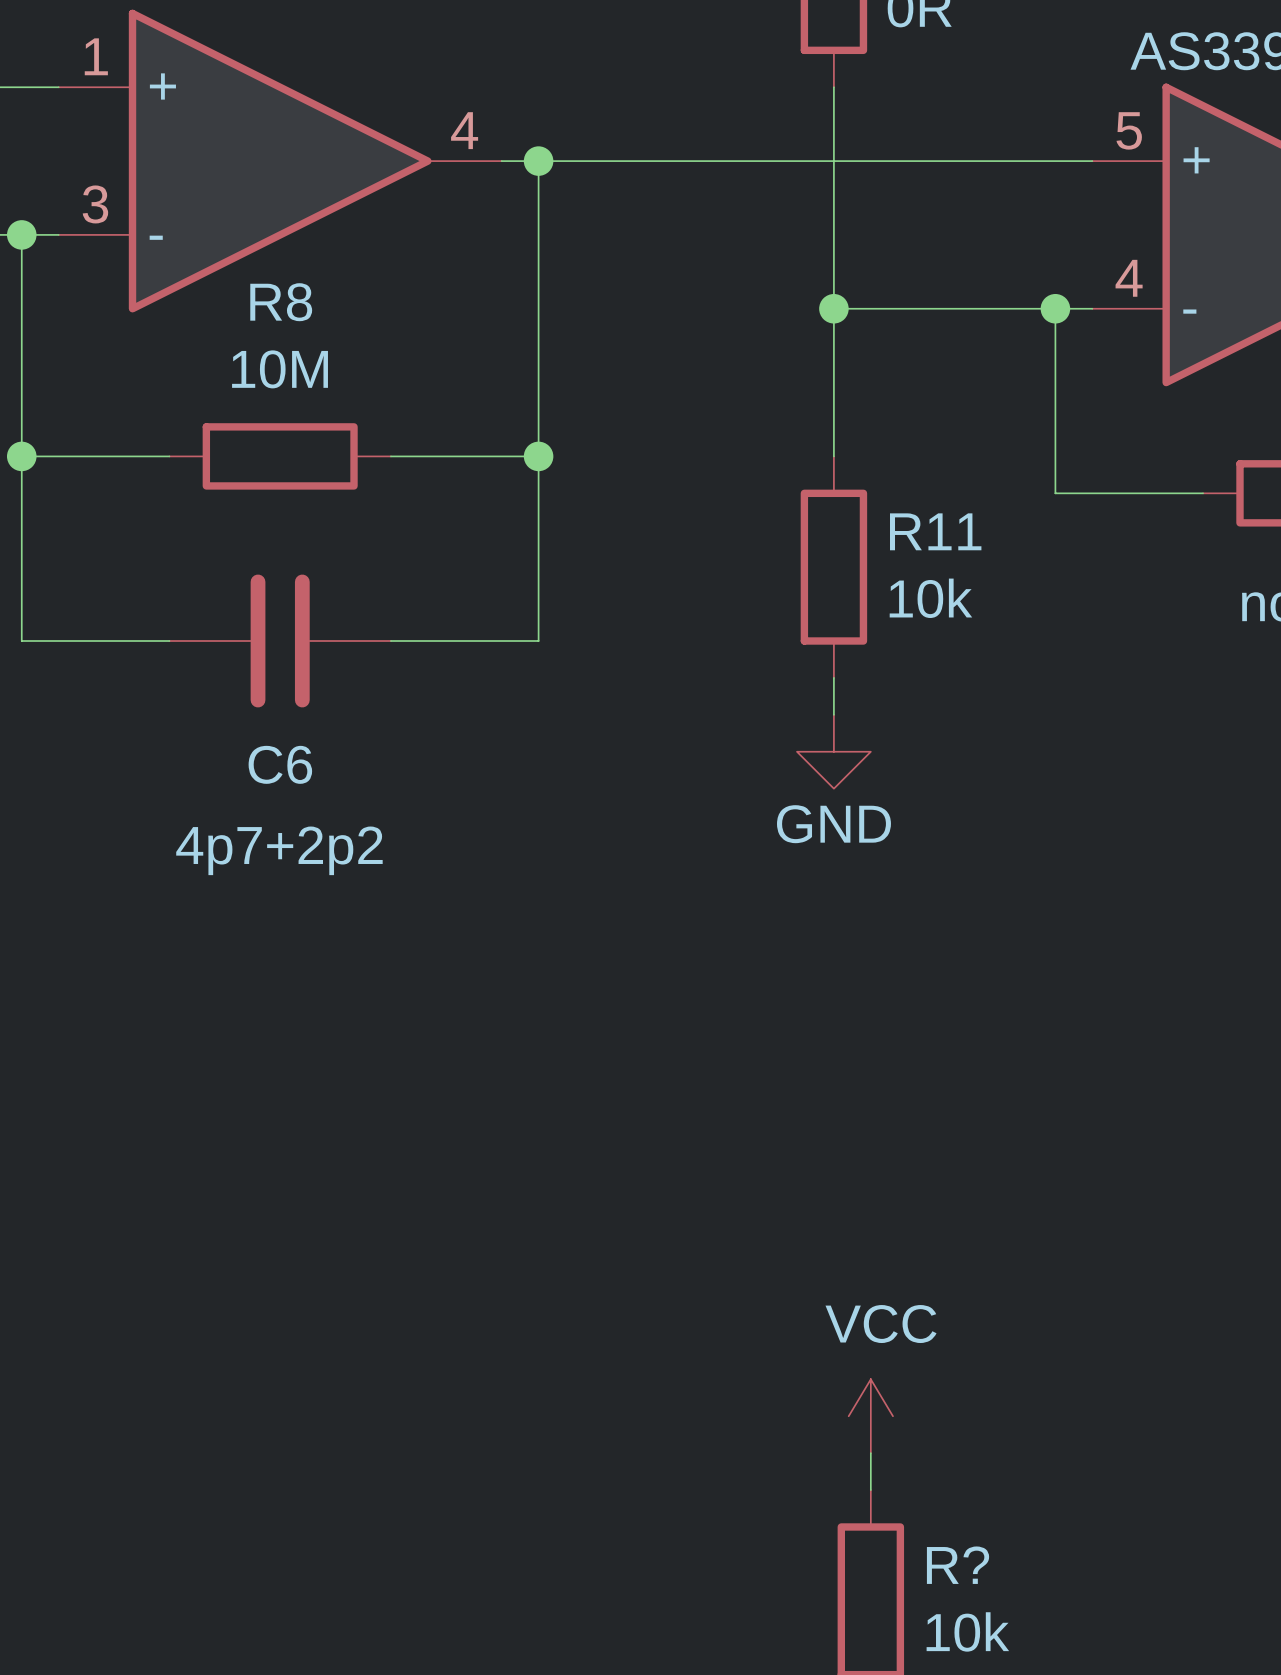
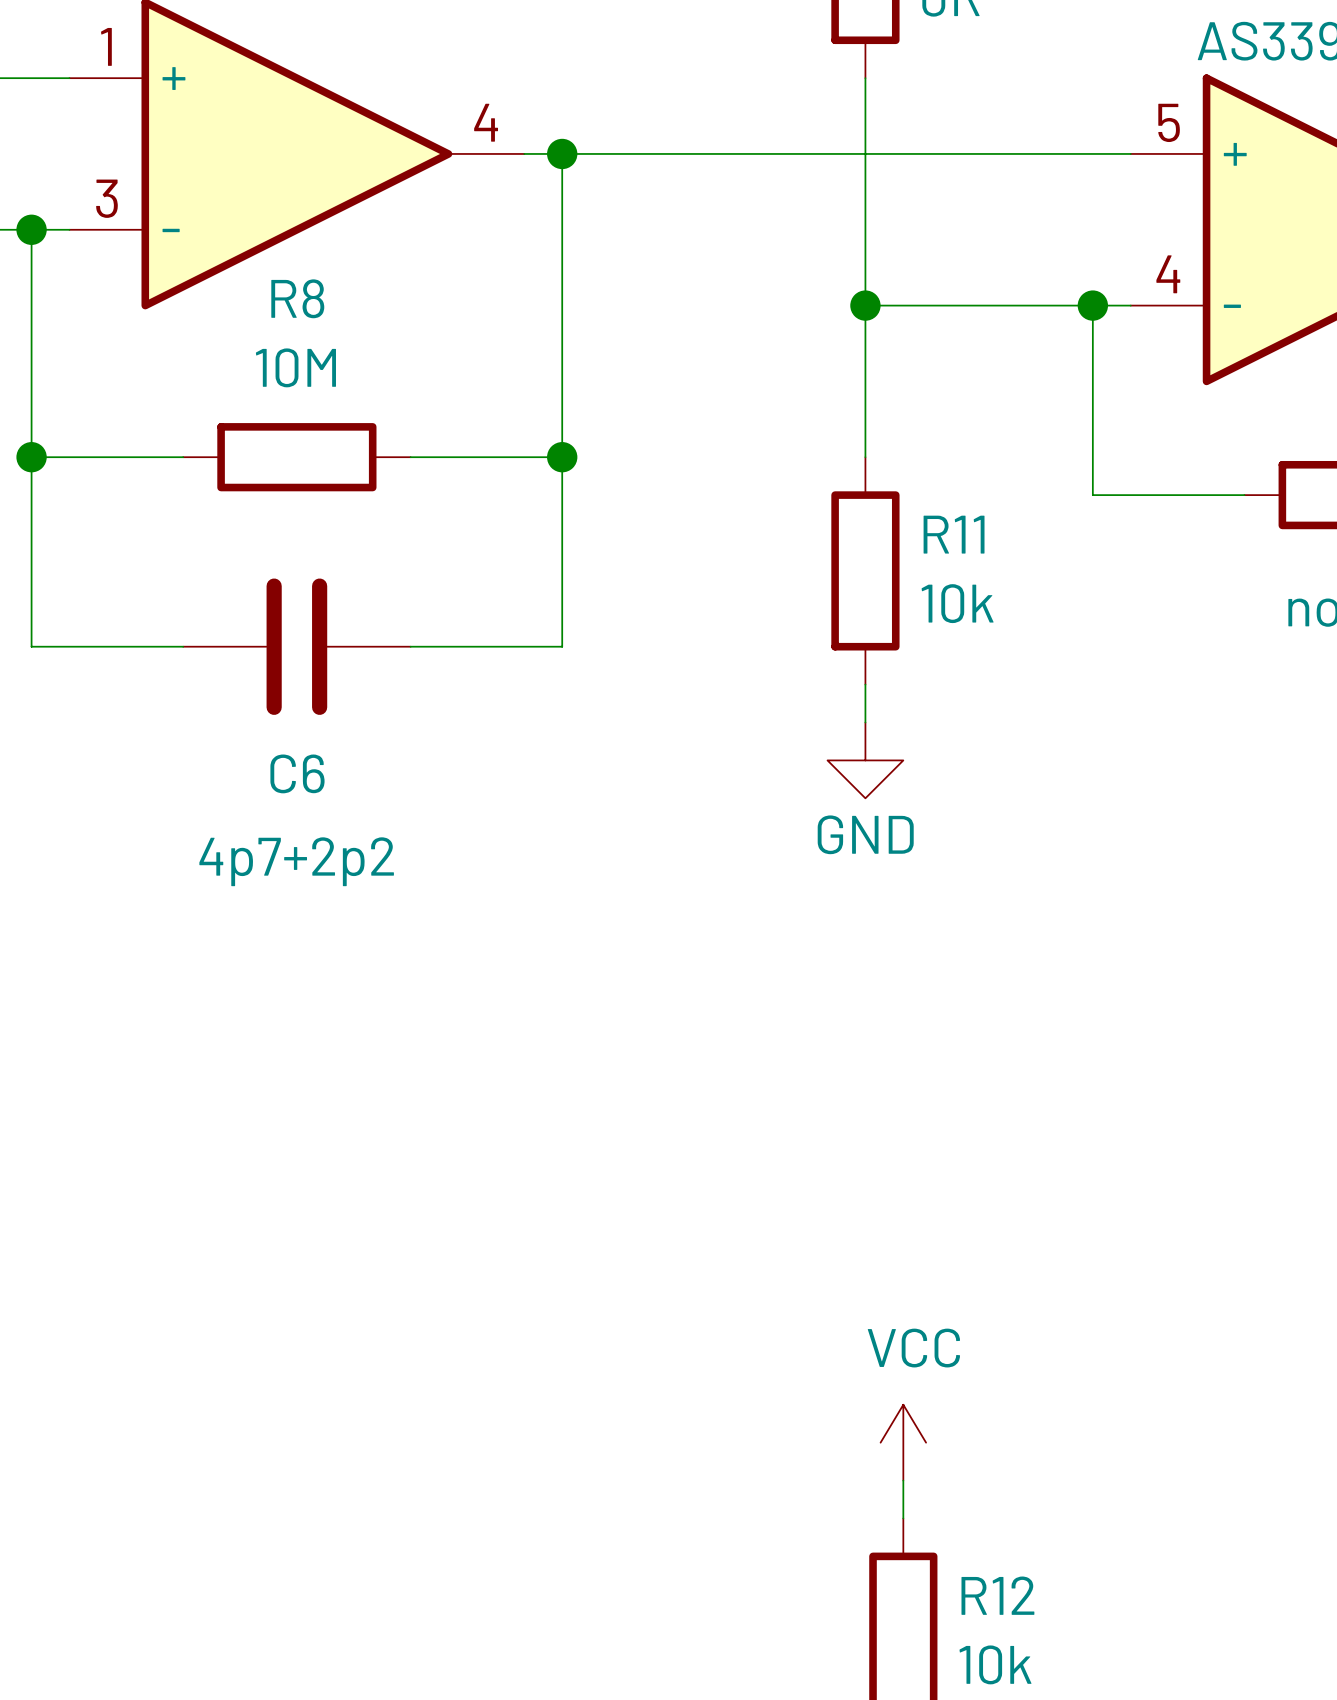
R? name: R? (958, 1565) -> R12 (997, 1595)

